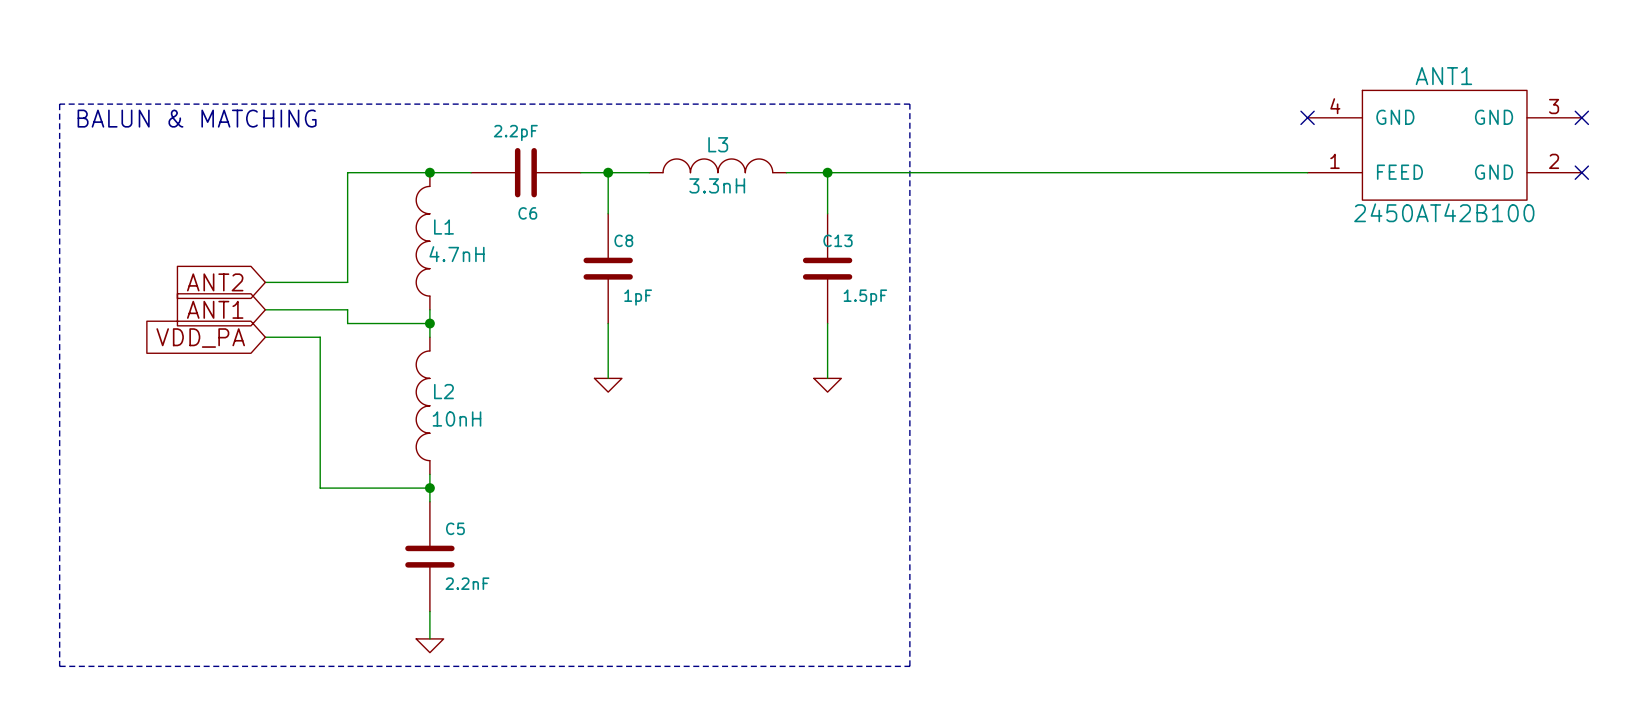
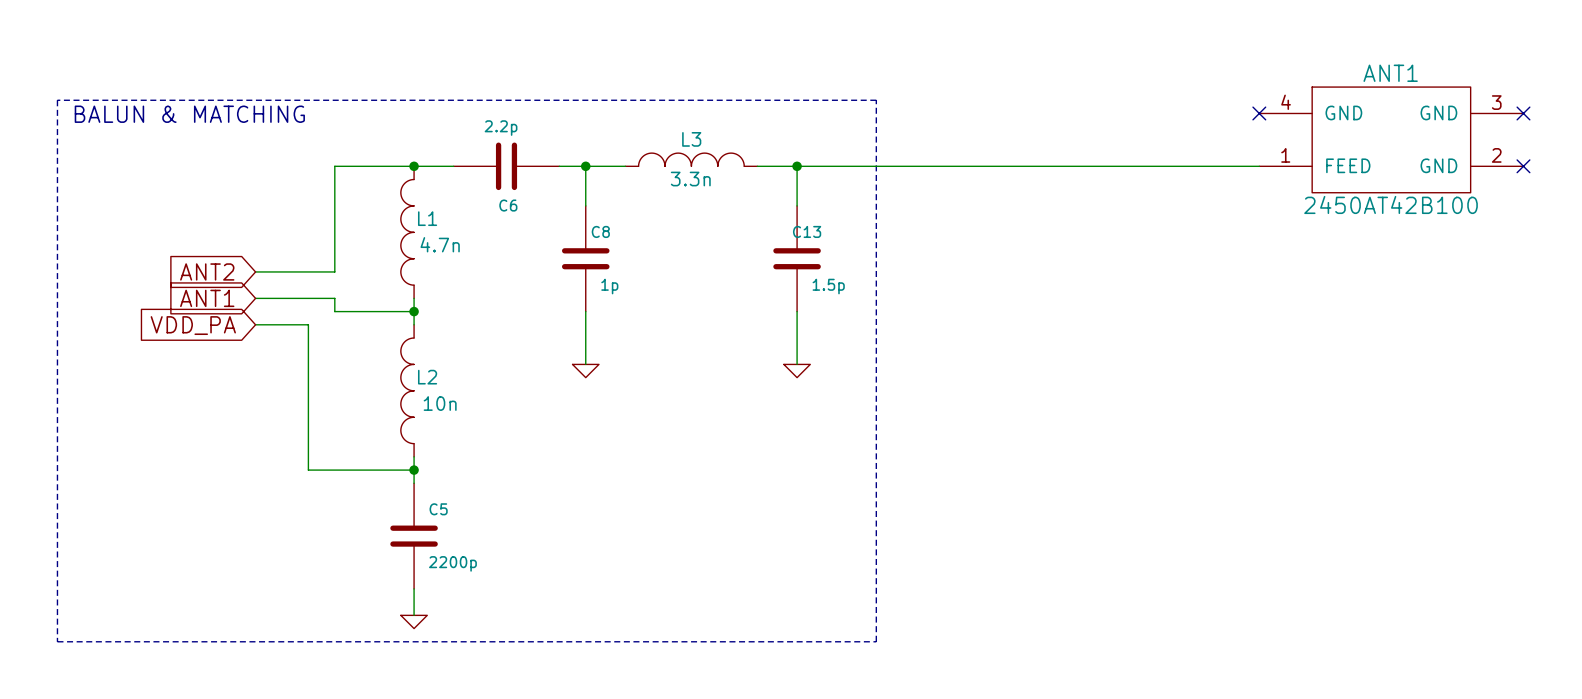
C6 value: 2.2pF (515, 132) -> 2.2p (501, 128)
L3 value: 3.3nH (717, 185) -> 3.3n (690, 179)
L1 value: 4.7nH (457, 254) -> 4.7n (440, 244)
C8 value: 1pF (638, 297) -> 1p (609, 286)
C13 value: 1.5pF (865, 297) -> 1.5p (828, 286)
L2 value: 10nH (457, 419) -> 10n (440, 403)
C5 value: 2.2nF (467, 583) -> 2200p (452, 563)

